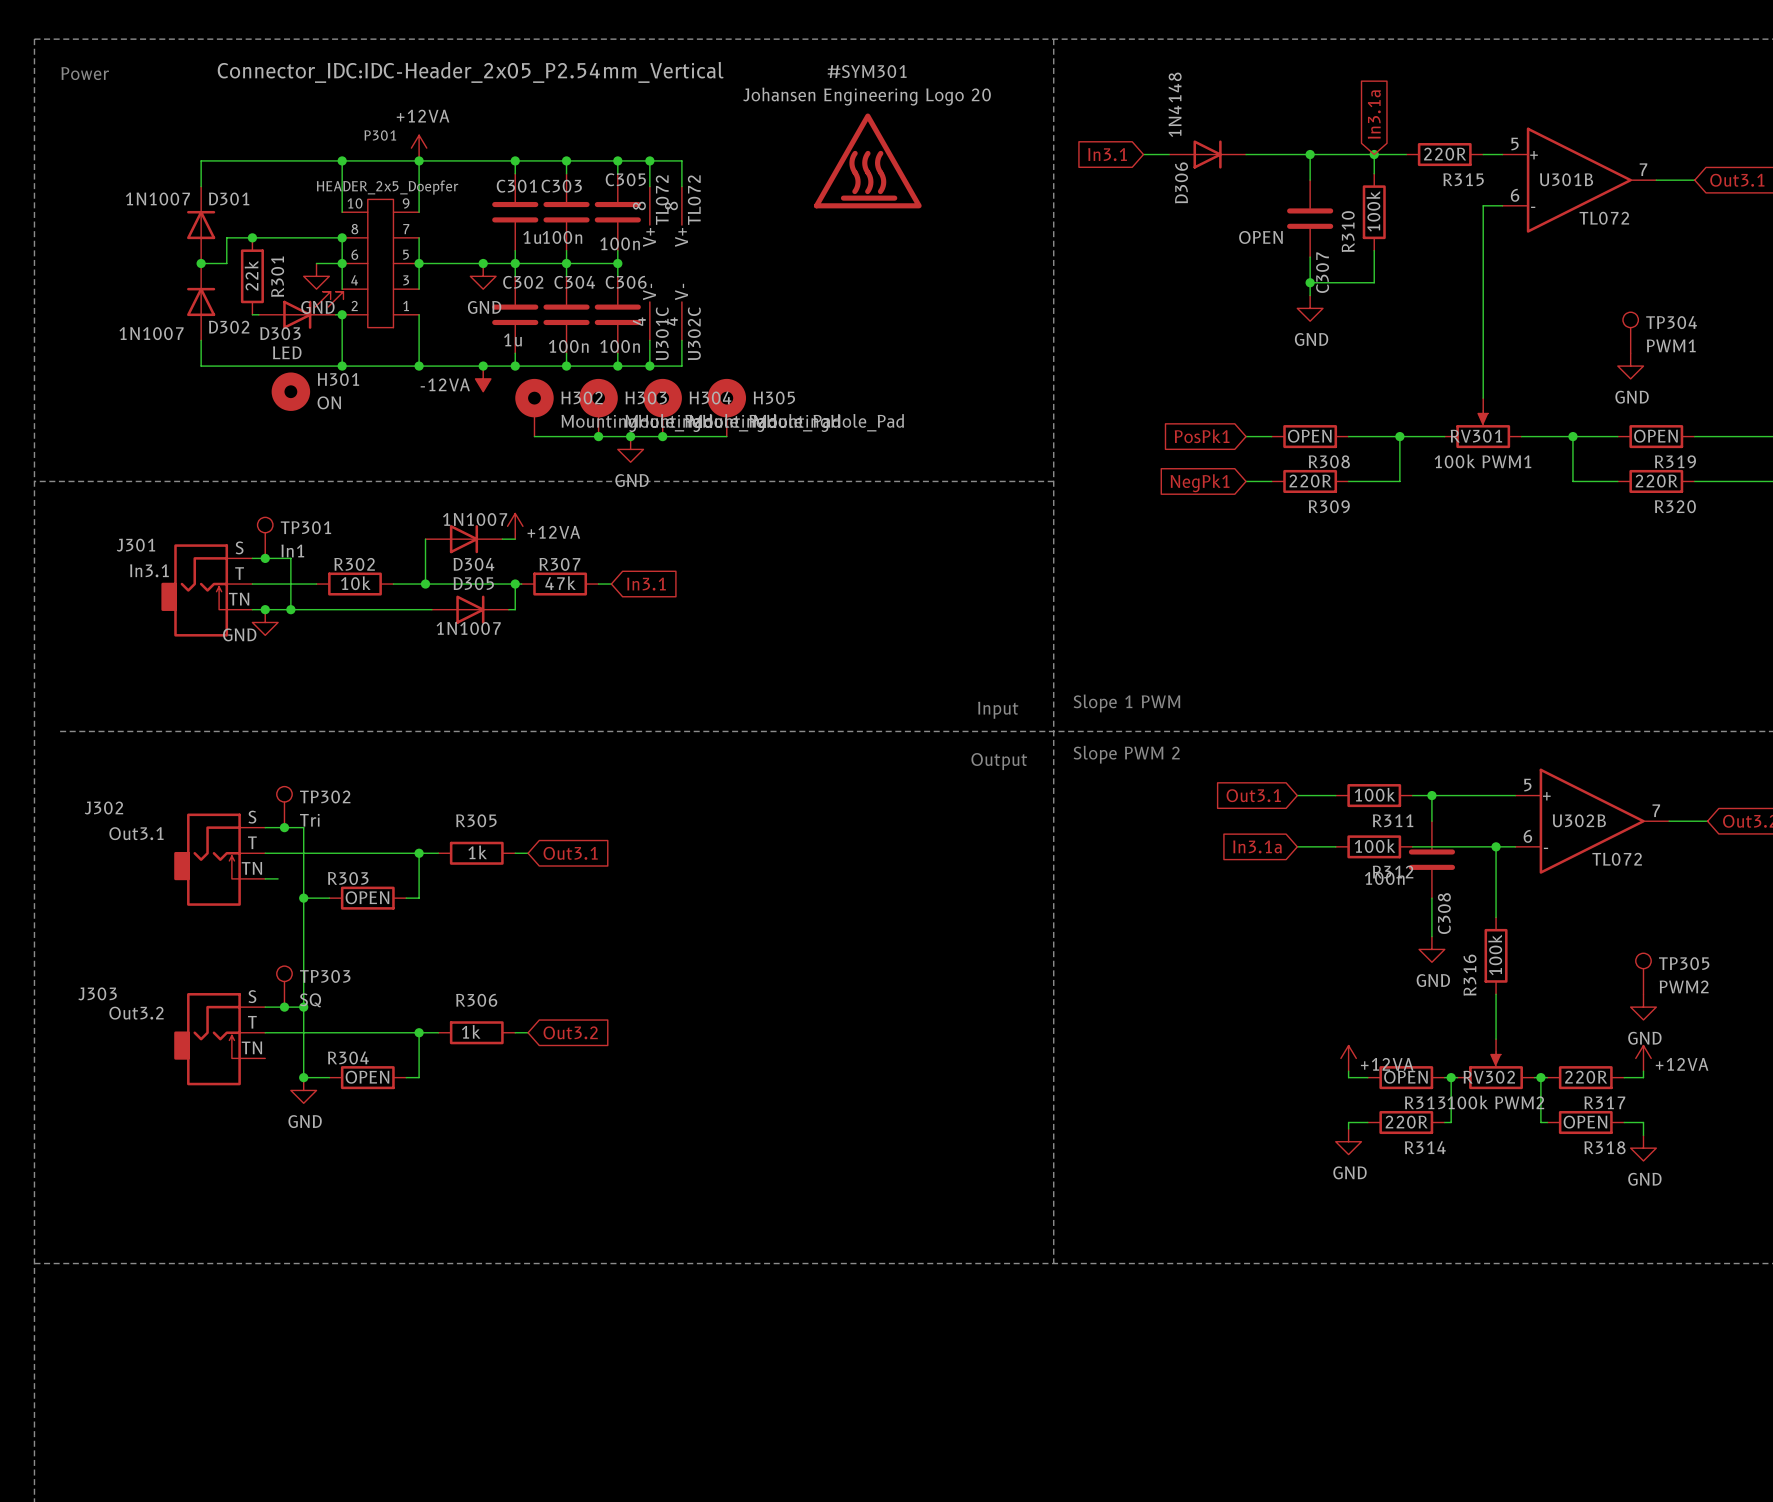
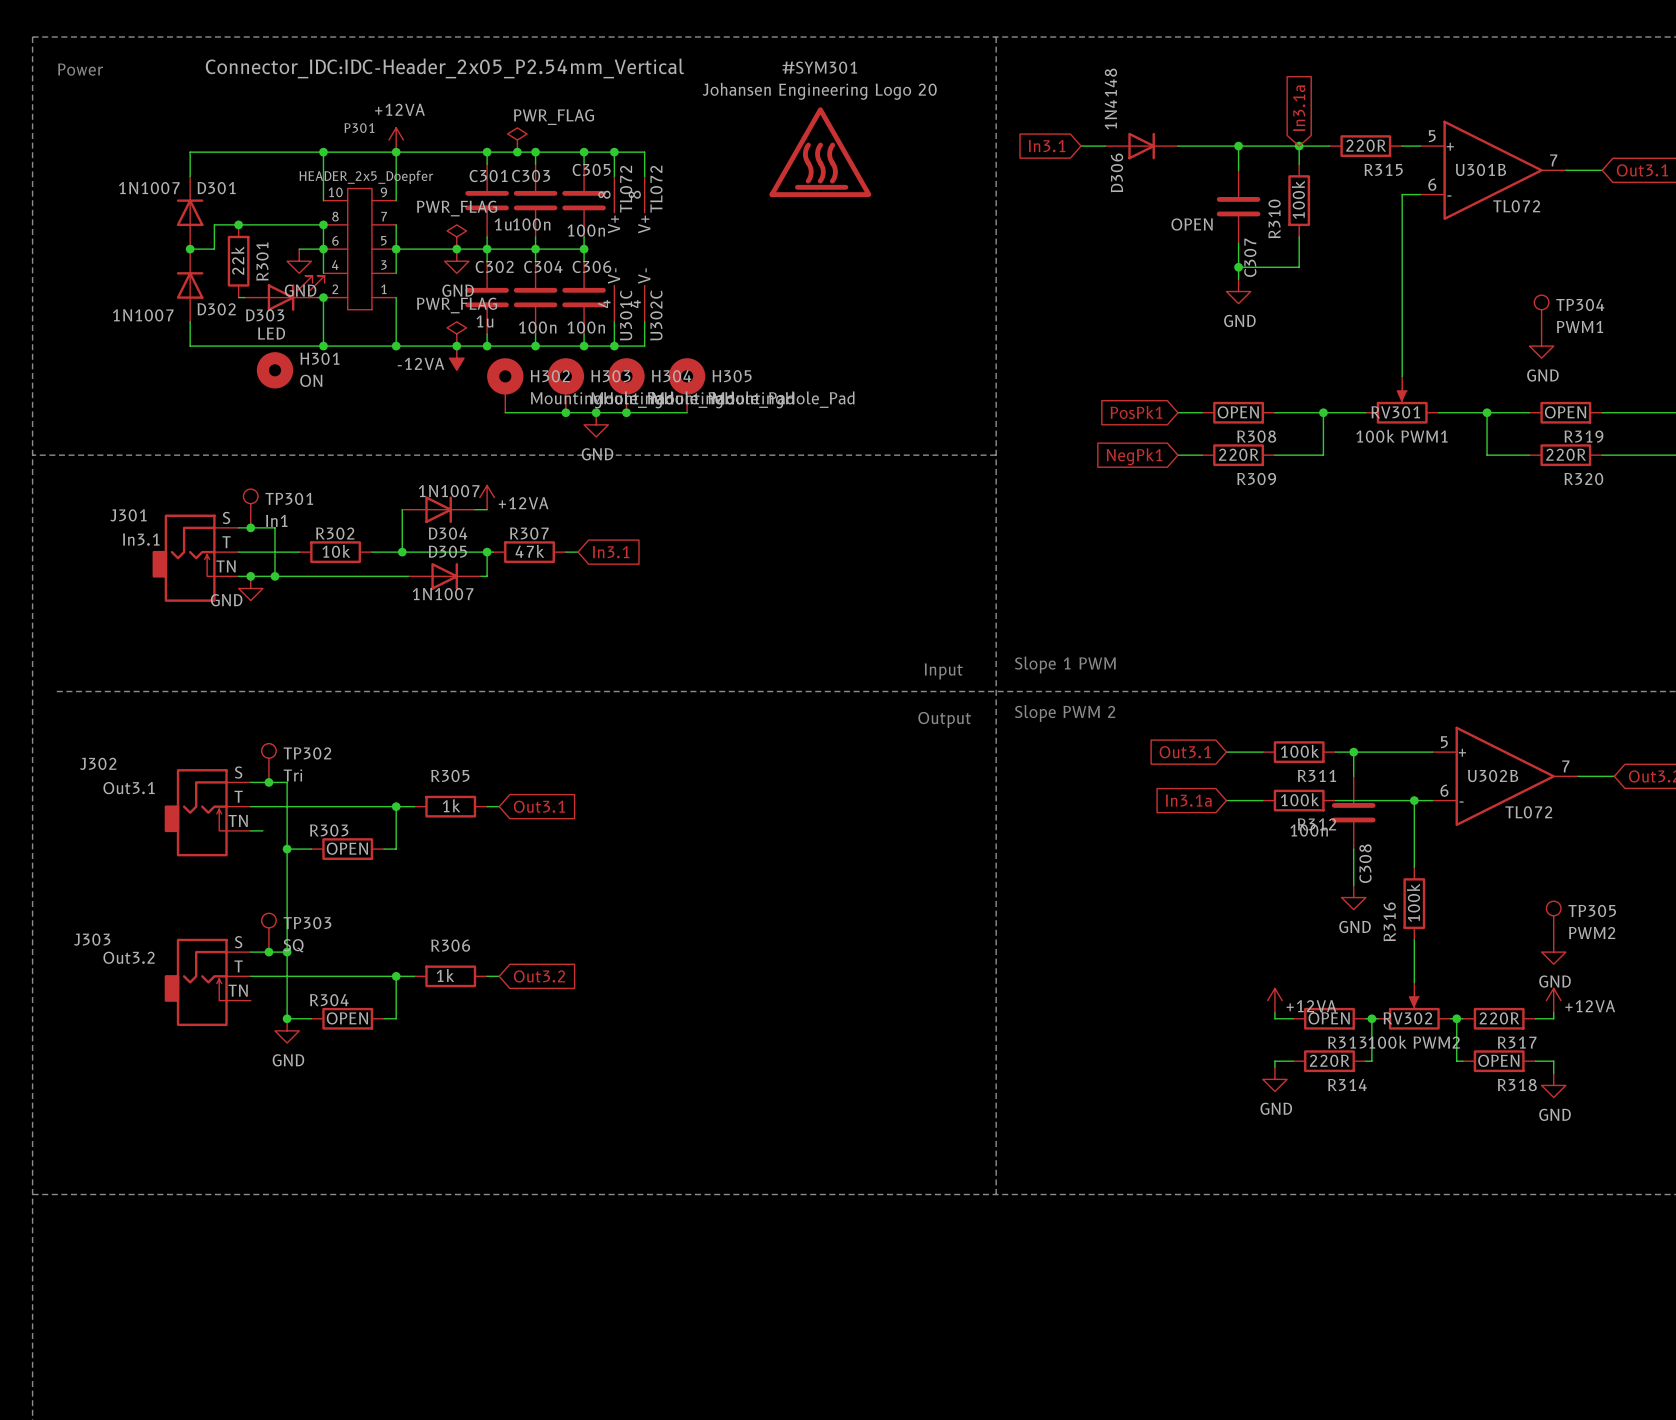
power symbol: none -> PWR_FLAG (517, 140)
junction: none -> (517, 152)
power symbol: none -> PWR_FLAG (456, 236)
power symbol: none -> PWR_FLAG (456, 333)

